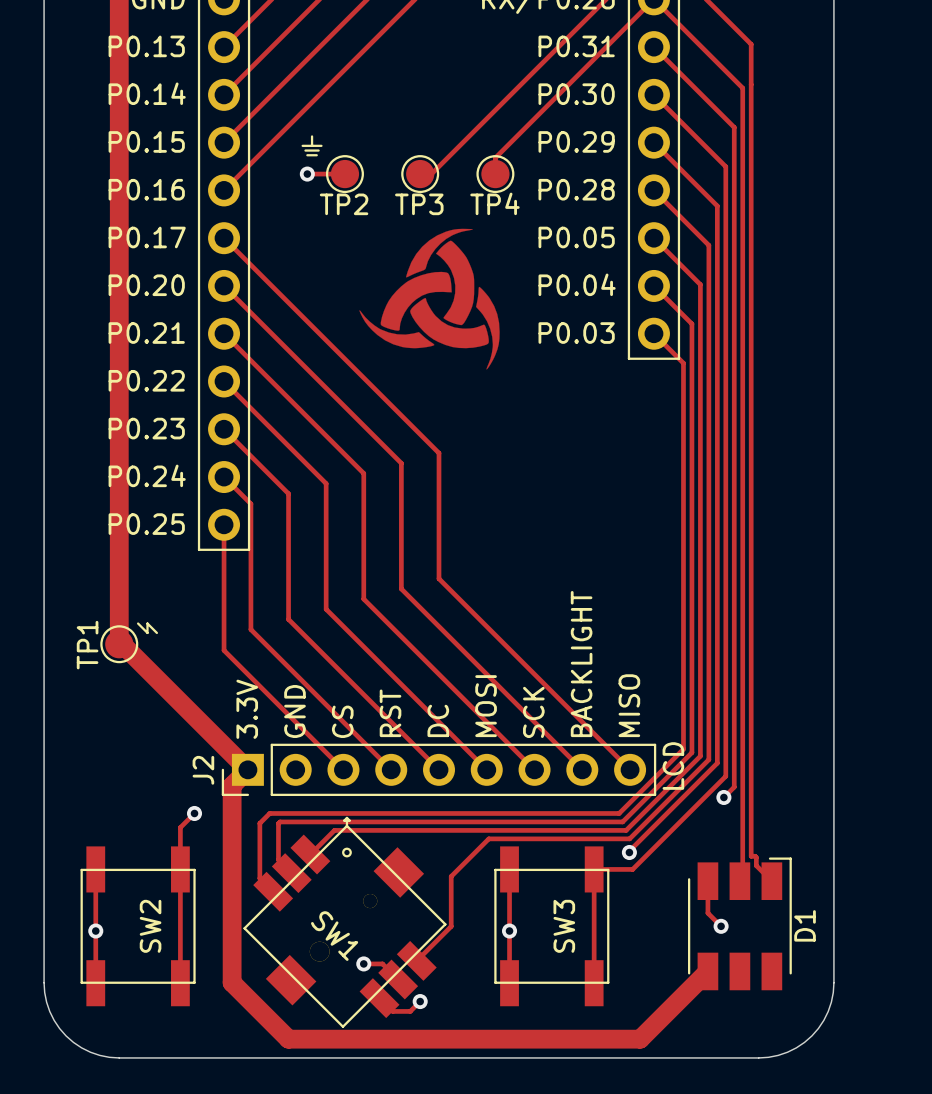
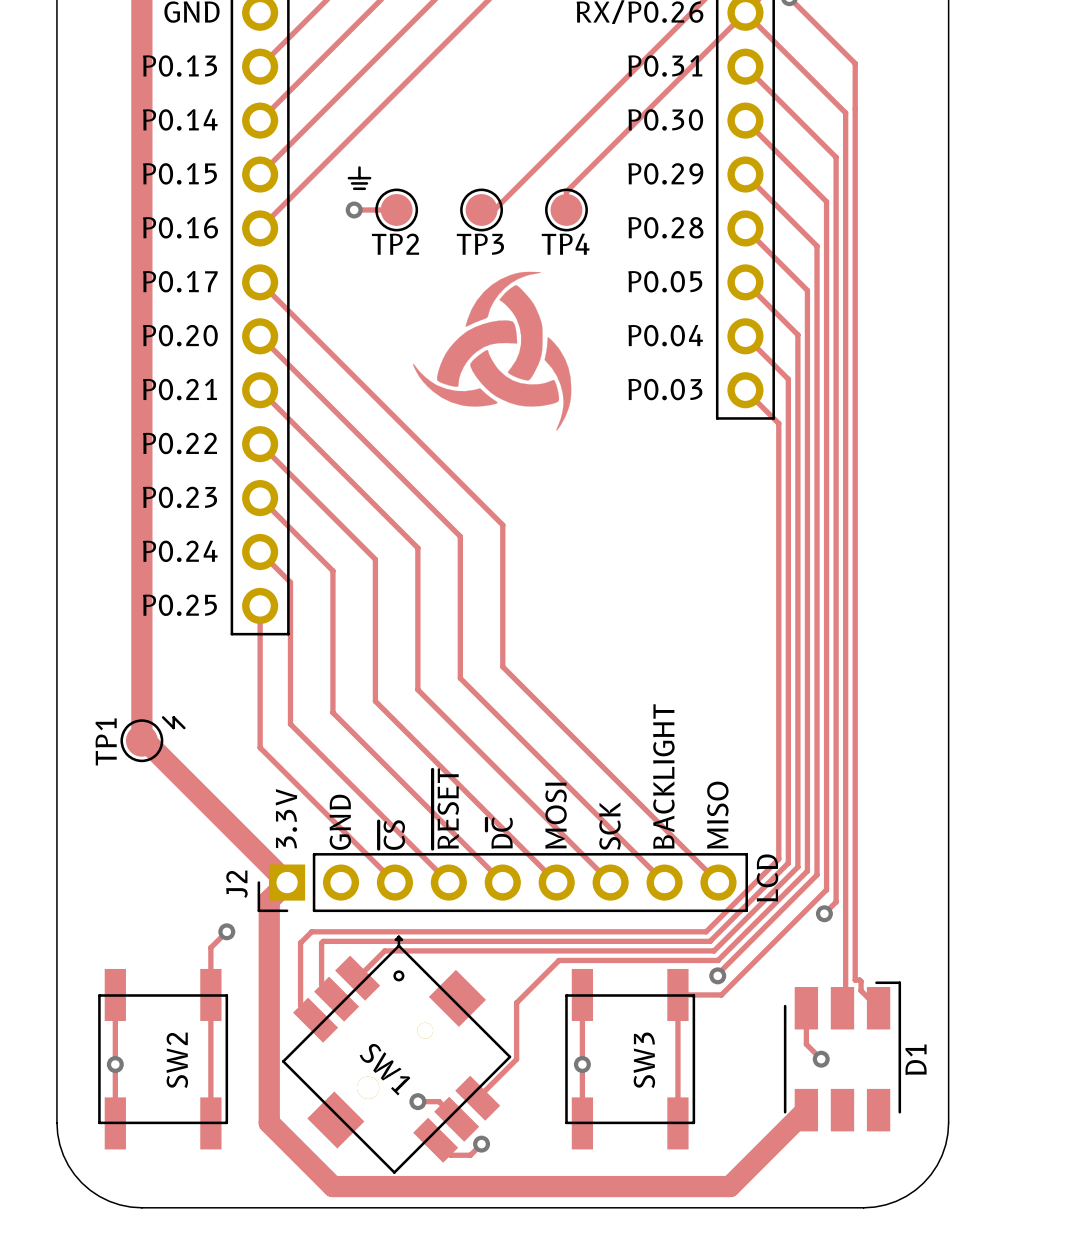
text: RST (390, 713) -> ~{RESET} (445, 808)
text: DC (438, 720) -> D~{C} (499, 833)
text: CS (342, 721) -> ~{CS} (391, 835)

